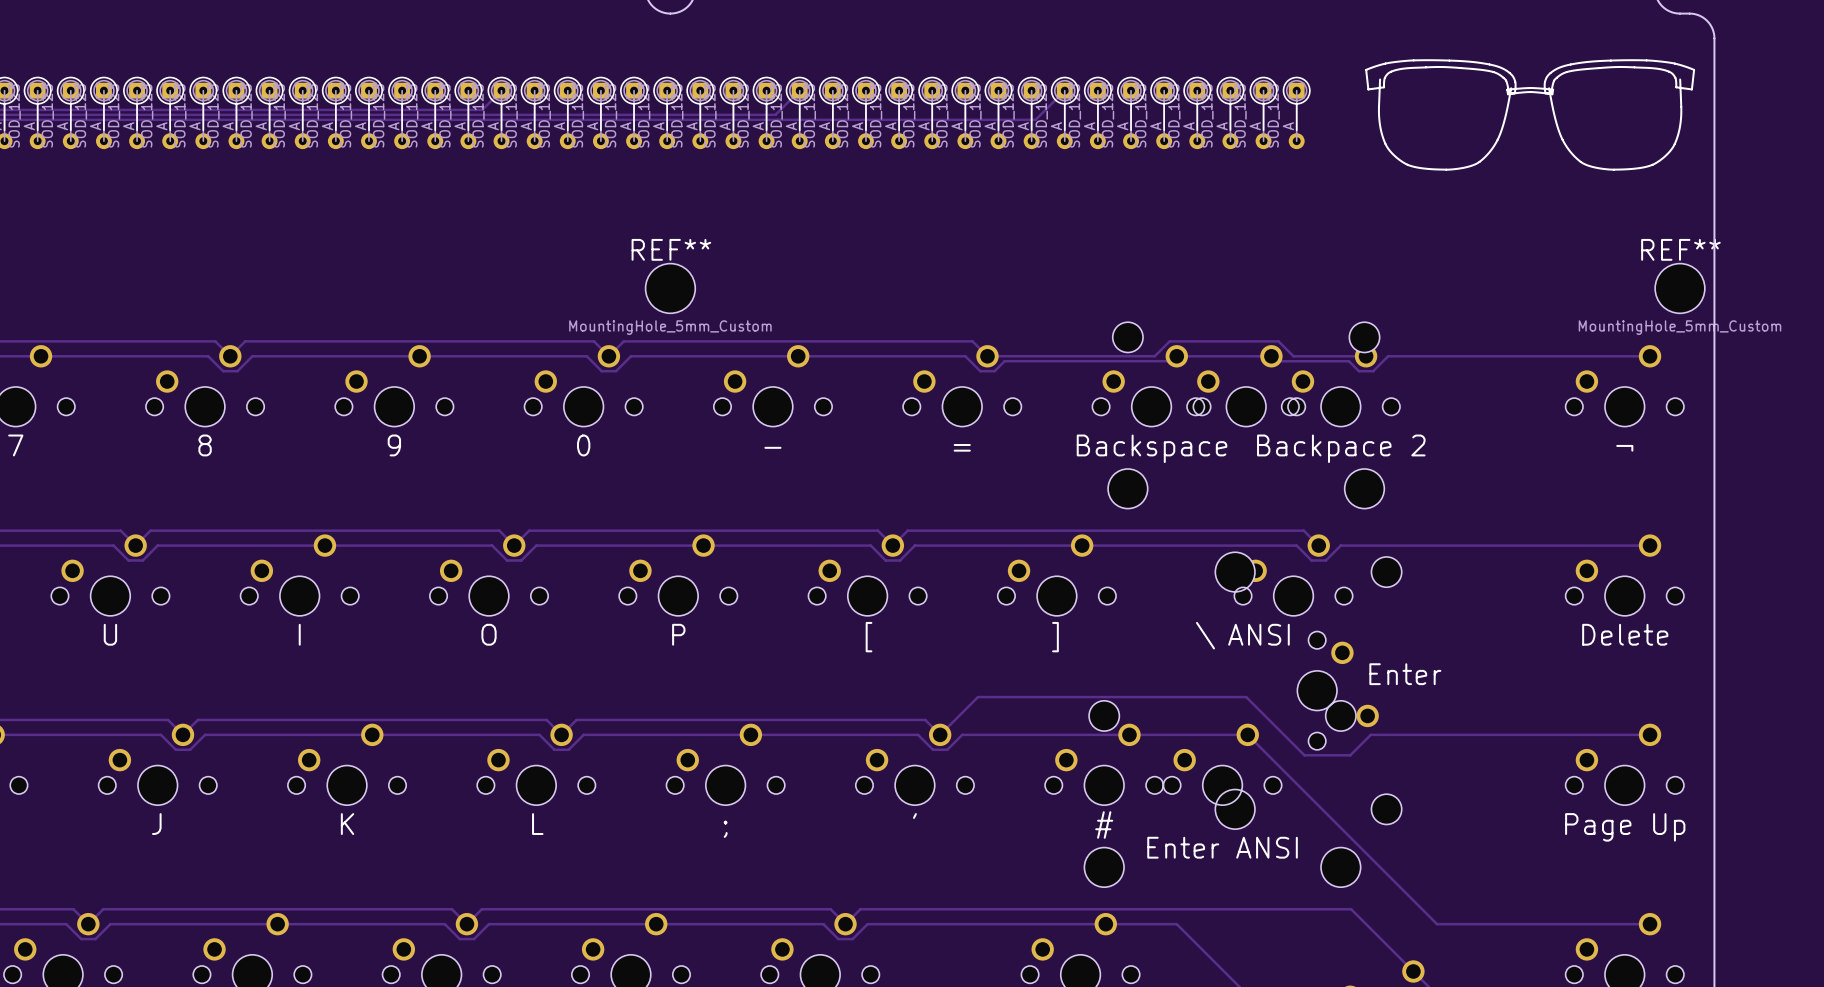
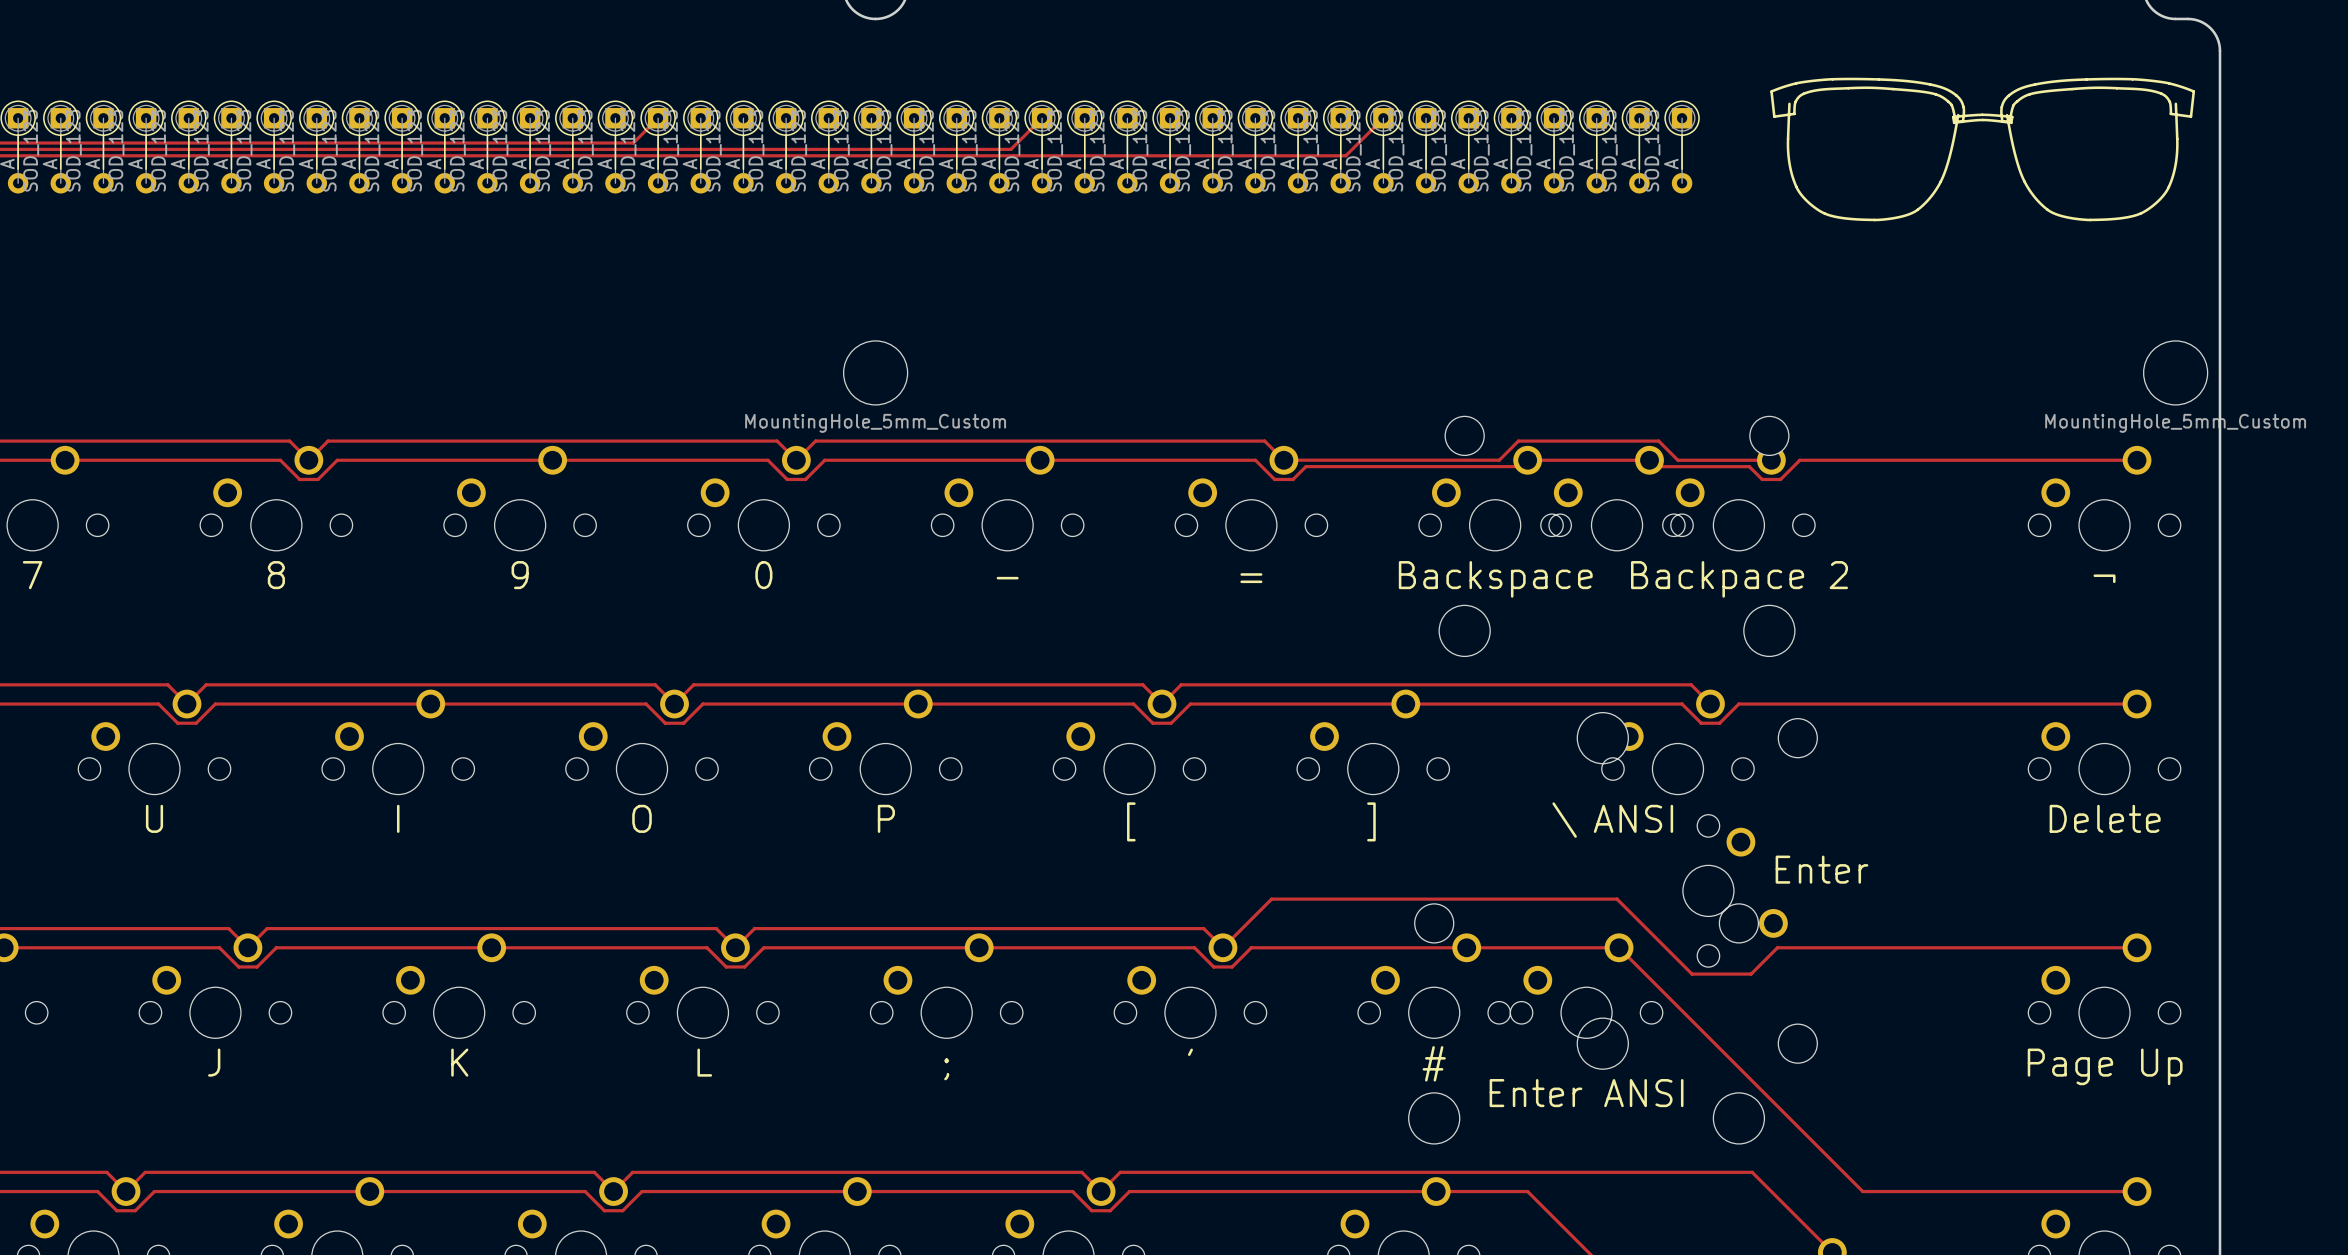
REF** name: REF** (671, 249) -> none
REF** name: REF** (1680, 249) -> none

